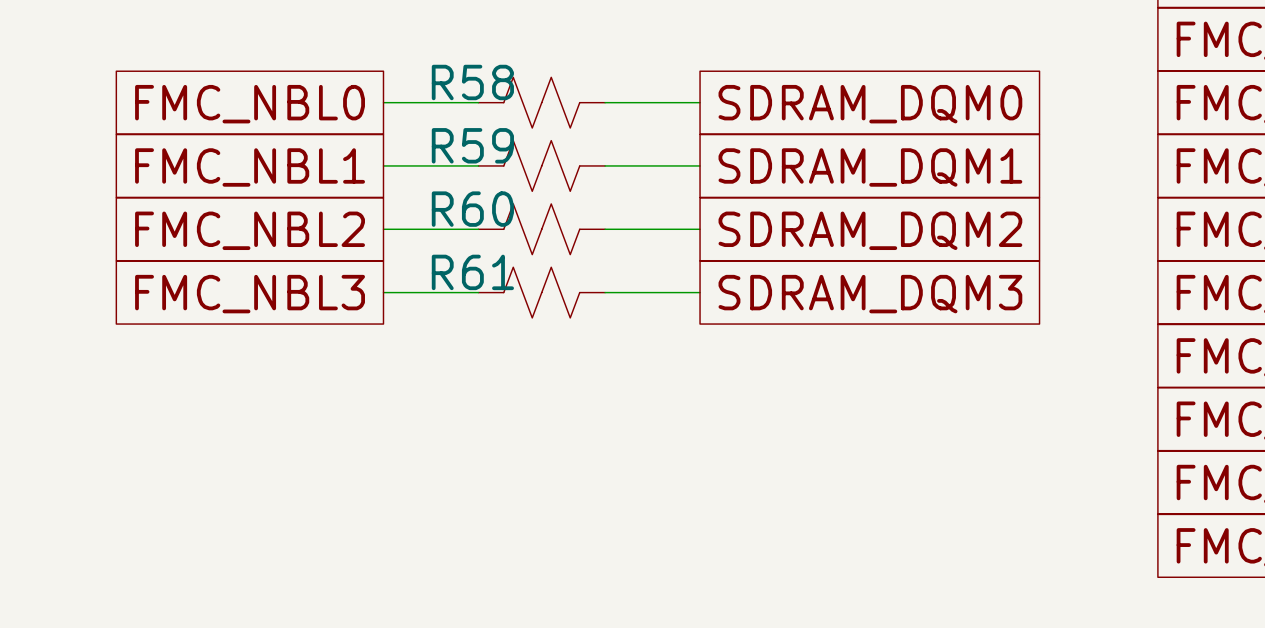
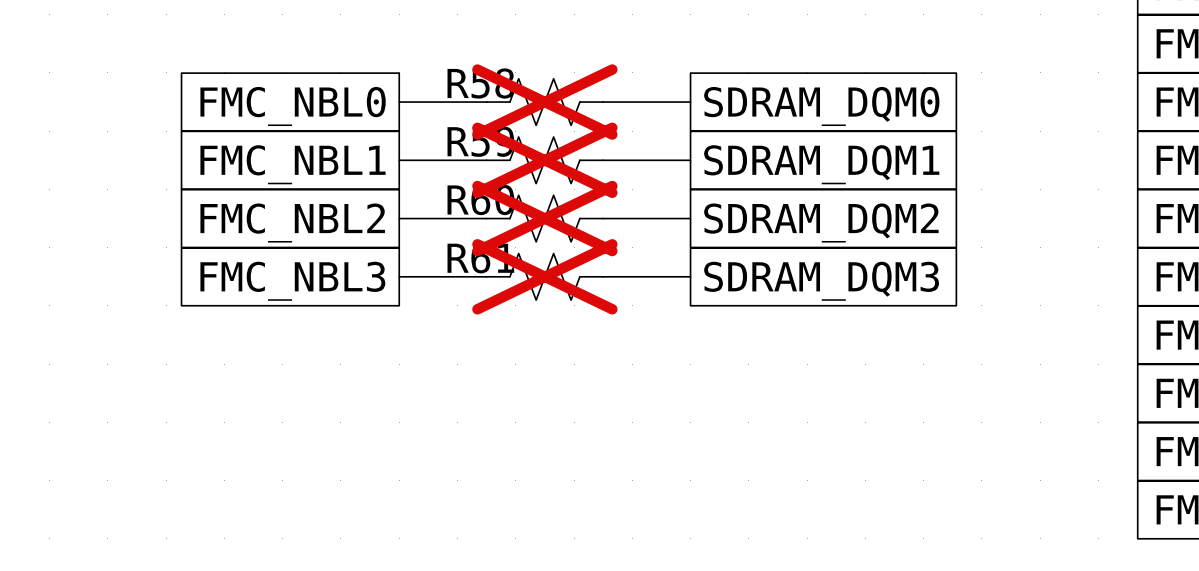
R58 do-not-place cross: none -> (544, 102)
R59 do-not-place cross: none -> (544, 160)
R60 do-not-place cross: none -> (544, 218)
R61 do-not-place cross: none -> (544, 276)

